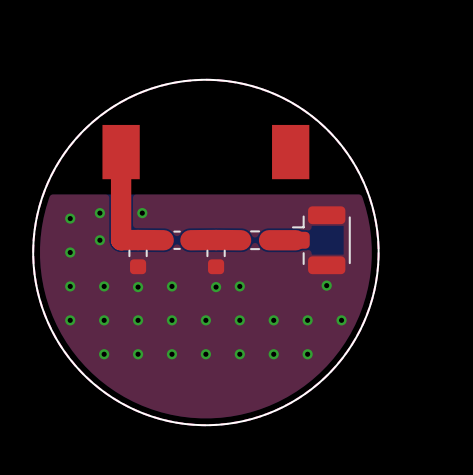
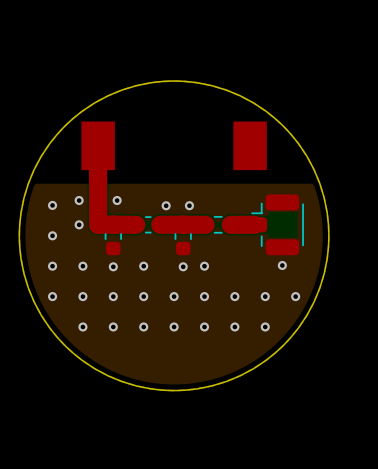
via: none -> (189, 205)
via: none -> (166, 205)

